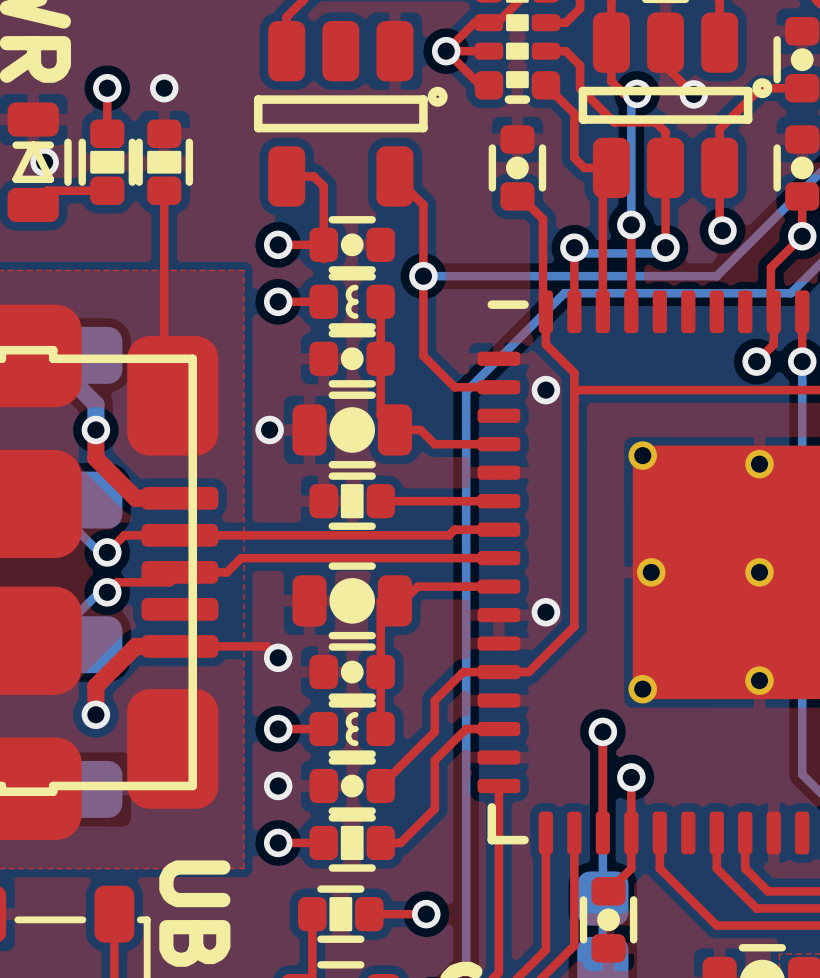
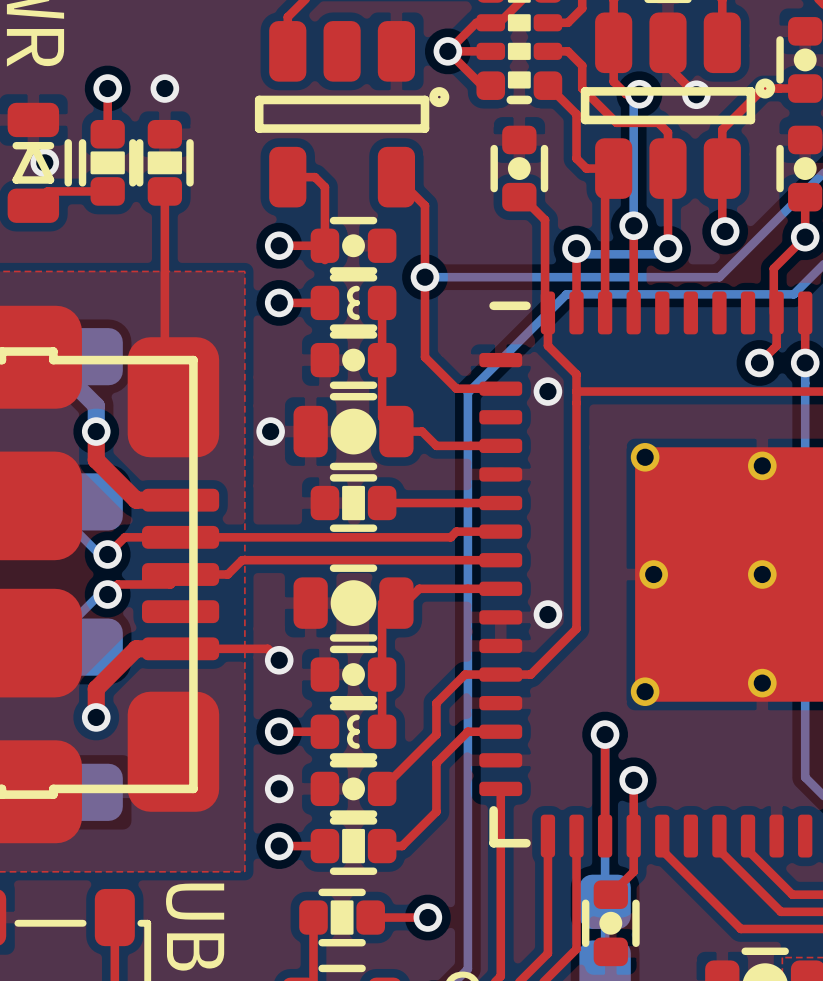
top track: (659, 847) (659, 868) (716, 925) (738, 925) -> (662, 850) (740, 928)
top track: (716, 847) (716, 868) (756, 908) (778, 908) -> (719, 850) (780, 911)
top track: (745, 847) (745, 868) (768, 891) (789, 891) -> (748, 850) (792, 894)

